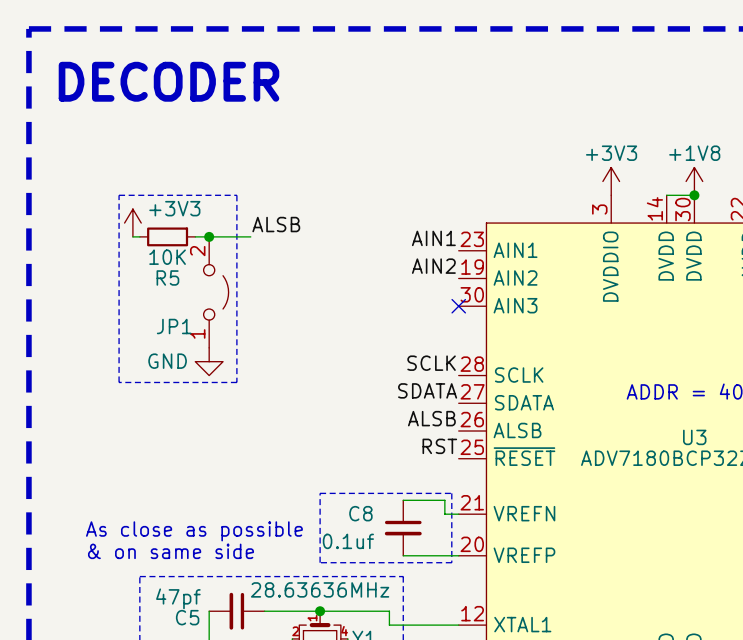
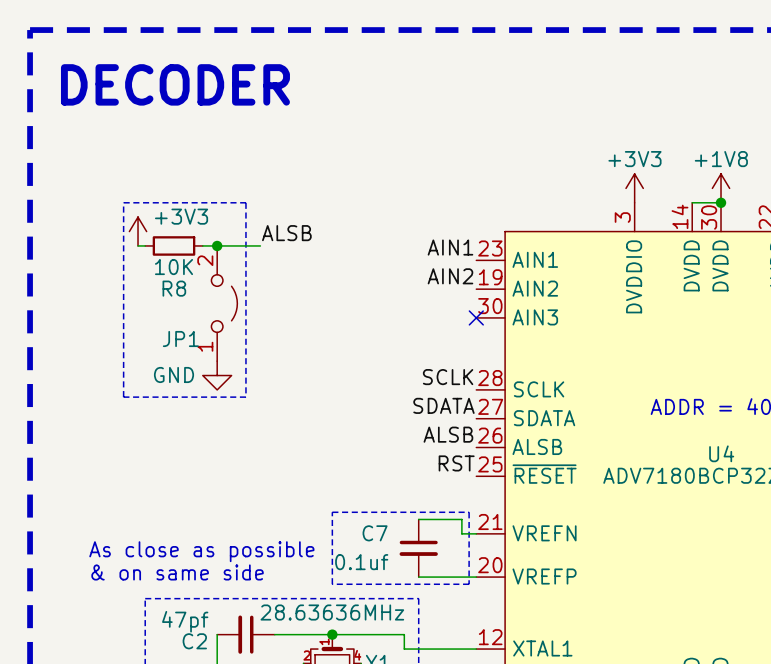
R5 name: R5 (167, 277) -> R8 (174, 288)
U3 name: U3 (694, 437) -> U4 (721, 453)
C8 name: C8 (360, 513) -> C7 (375, 533)
C5 name: C5 (187, 617) -> C2 (194, 641)

